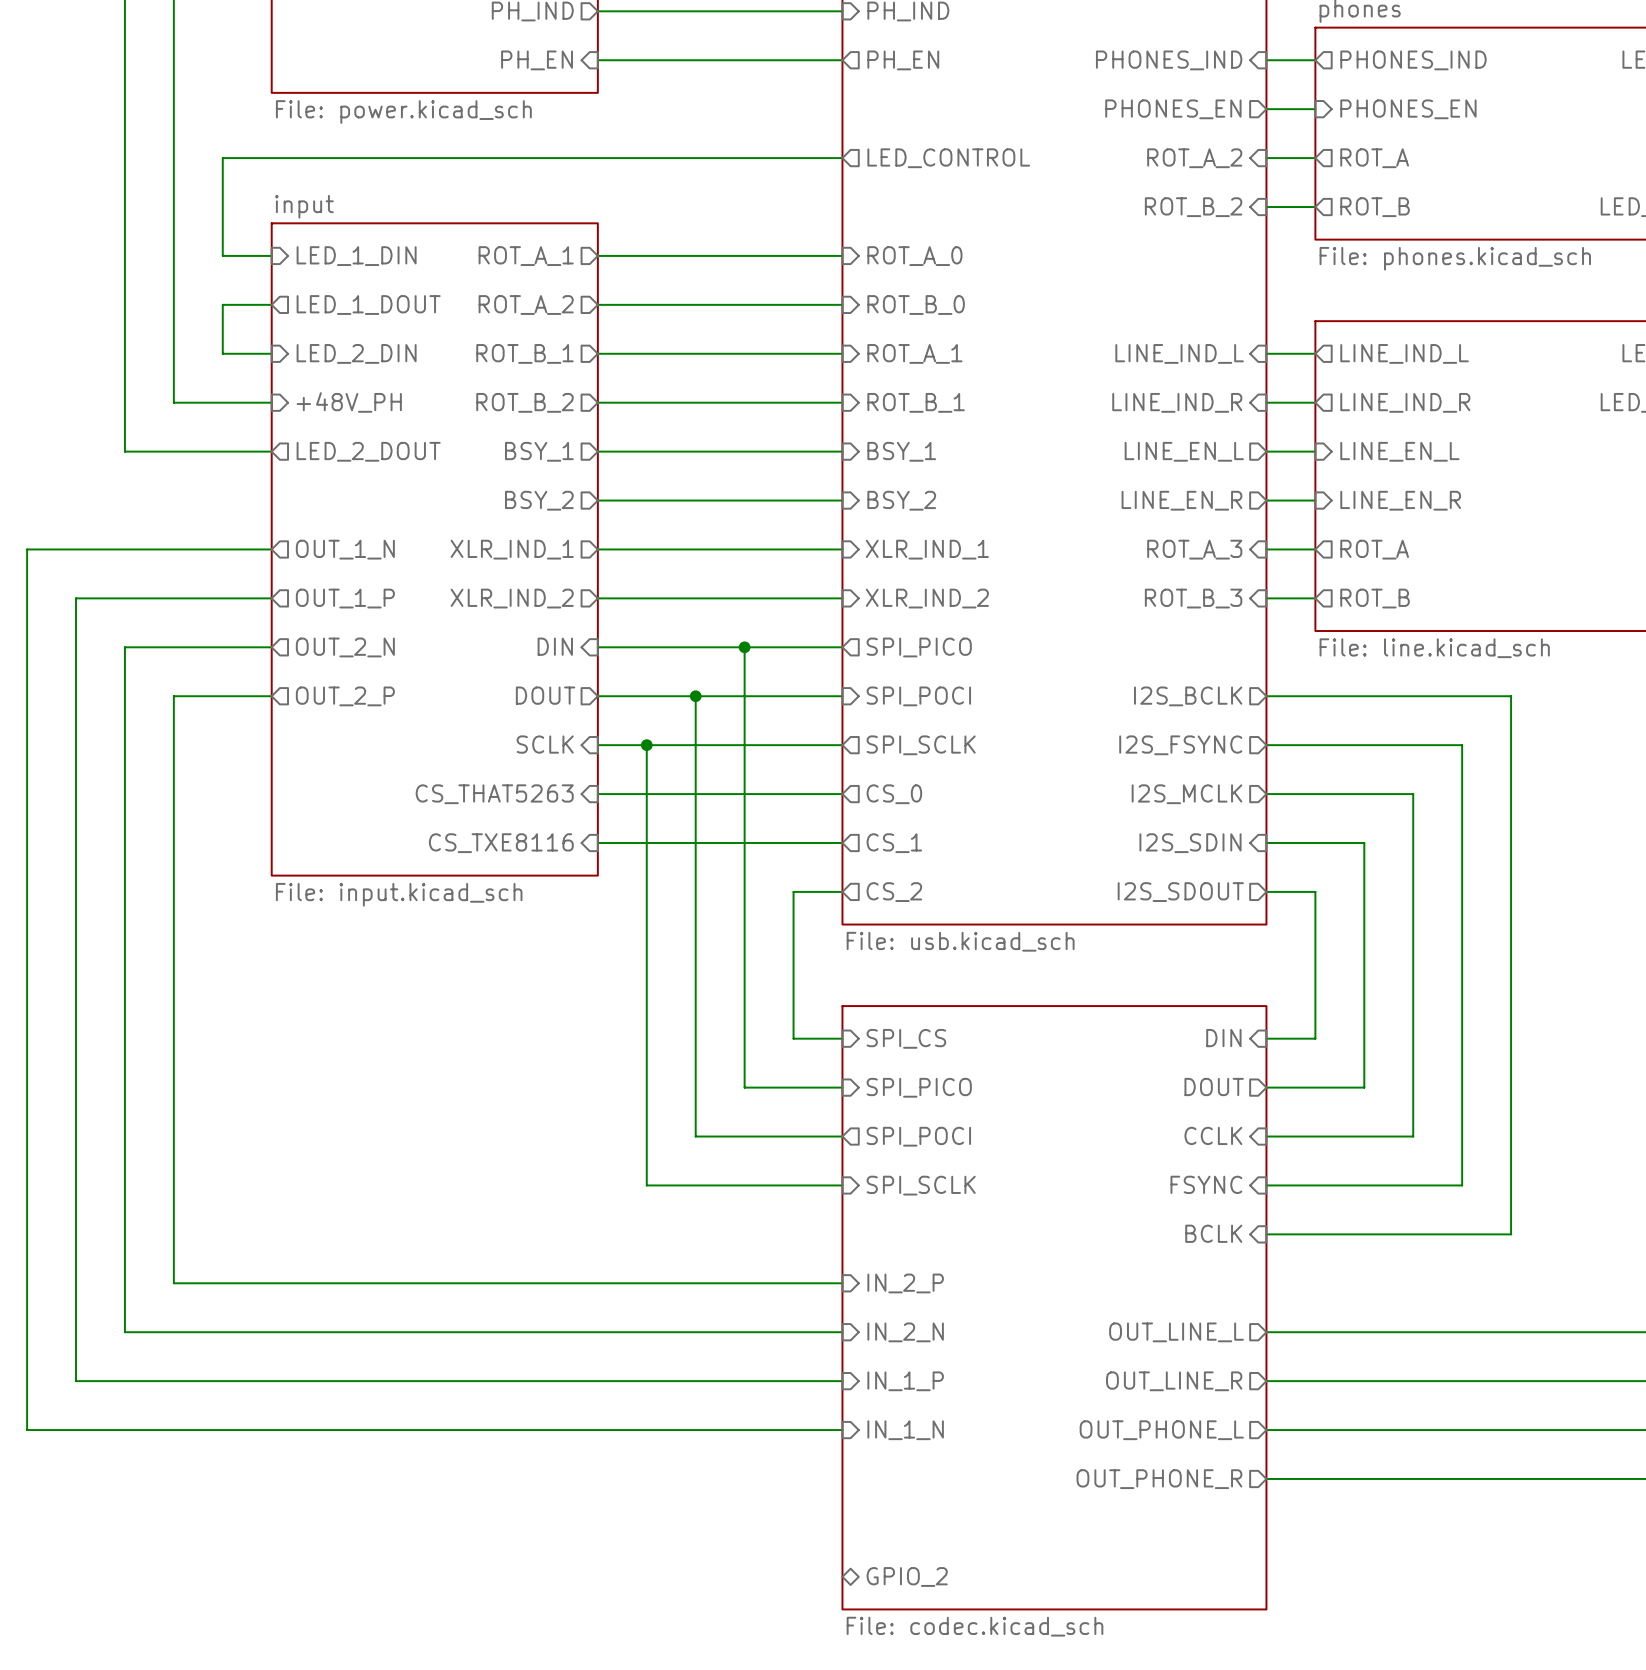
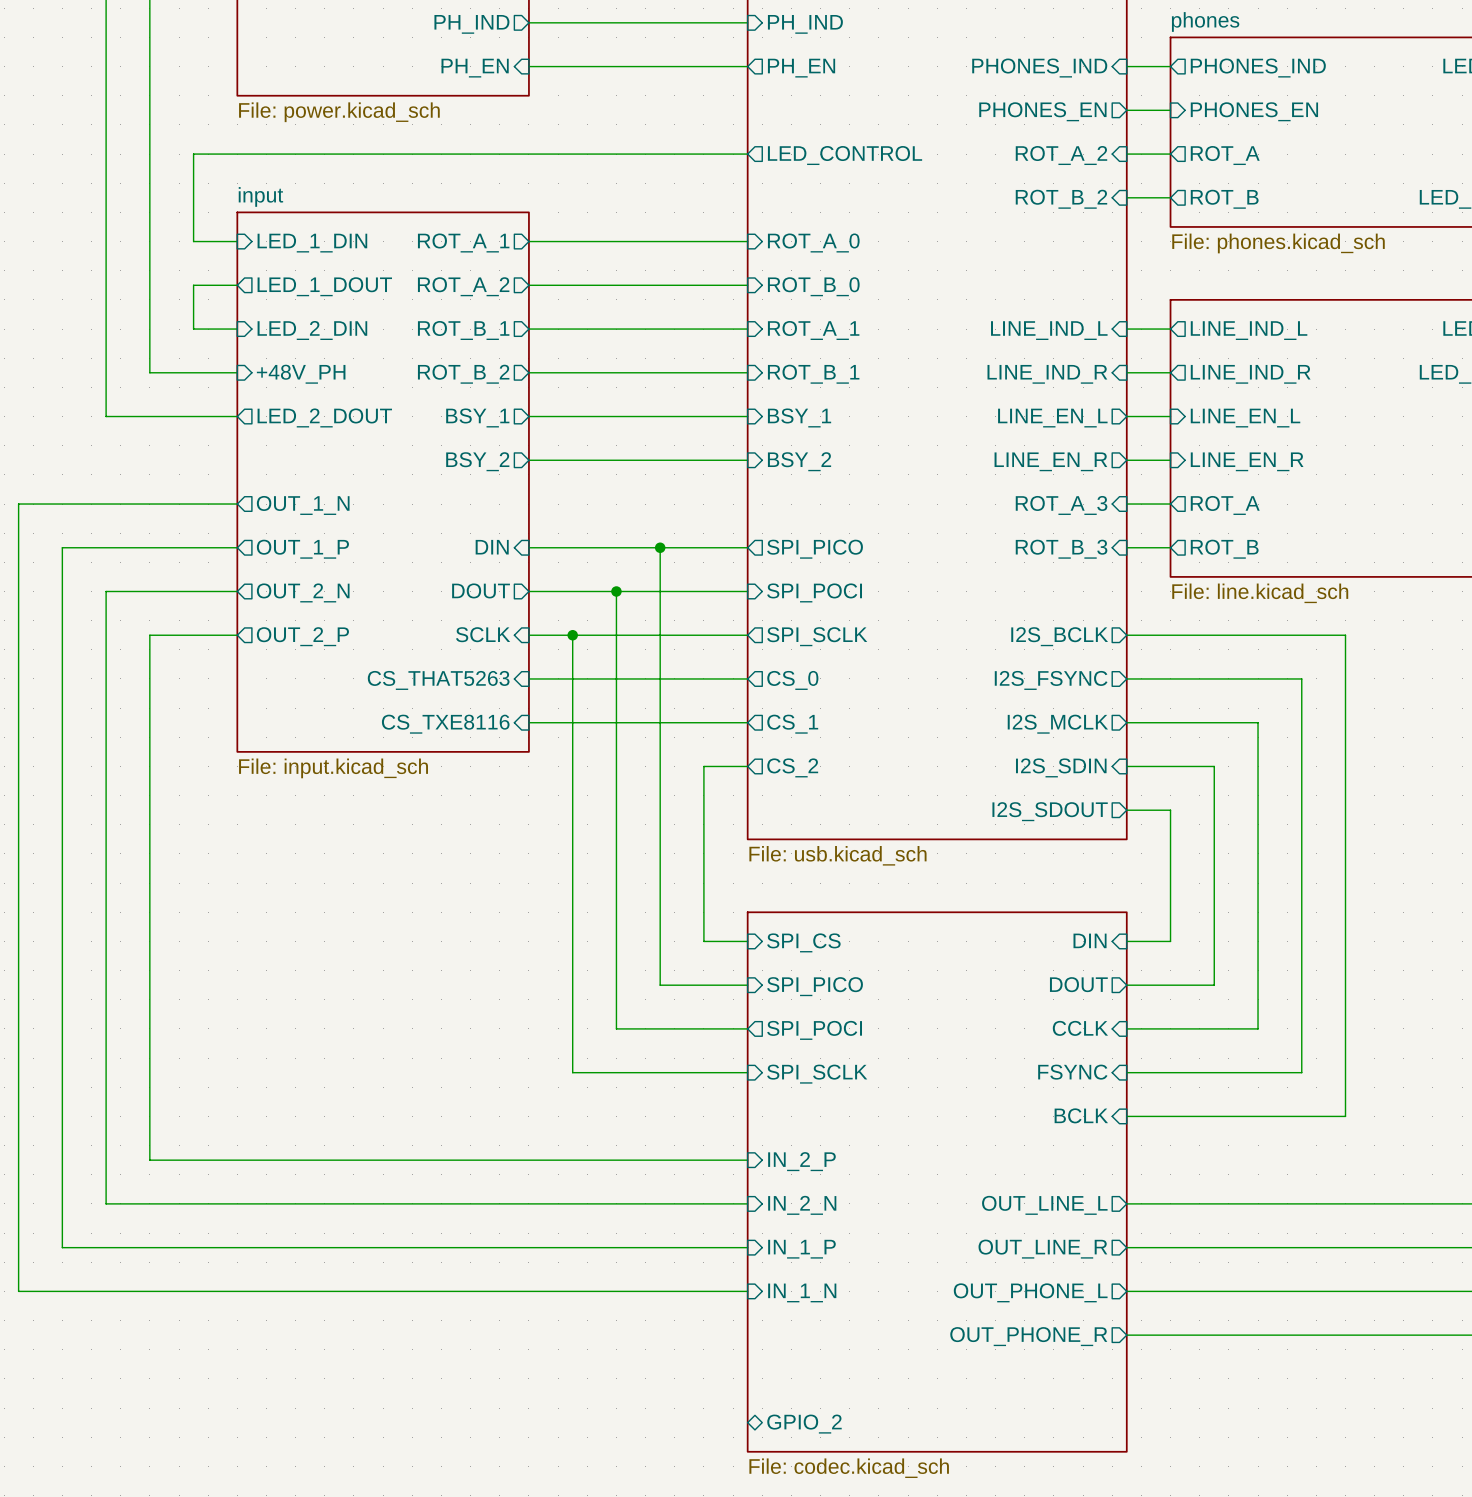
sheet input: none -> File: input.kicad_sch (383, 482)
sheet input: File: input.kicad_sch (434, 549) -> none
sheet pin: XLR_IND_1 (512, 549) -> none
wire: (597, 549) (842, 549) -> none
sheet pin: XLR_IND_1 (927, 549) -> none
sheet pin shape: output (512, 598) -> input (492, 547)
sheet pin: XLR_IND_2 (512, 598) -> DIN (492, 547)
wire: none -> (660, 547) (660, 591)
junction: none -> (660, 547)
sheet pin shape: input (927, 598) -> output (815, 549)
sheet pin: XLR_IND_2 (927, 598) -> SPI_PICO (815, 549)
sheet pin shape: input (555, 646) -> output (481, 590)
sheet pin: DIN (555, 646) -> DOUT (481, 590)
wire: none -> (616, 591) (616, 635)
junction: none -> (616, 591)
junction: (744, 647) -> none
sheet pin shape: output (919, 647) -> input (814, 592)
sheet pin: SPI_PICO (919, 647) -> SPI_POCI (814, 592)
sheet pin shape: output (545, 695) -> input (483, 634)
sheet pin: DOUT (545, 695) -> SCLK (483, 634)
wire: none -> (572, 635) (572, 678)
junction: none -> (572, 635)
junction: (695, 696) -> none
sheet pin shape: input (918, 696) -> output (817, 636)
sheet pin: SPI_POCI (918, 696) -> SPI_SCLK (817, 636)
sheet pin: SCLK (545, 744) -> CS_THAT5263 (438, 680)
junction: (646, 745) -> none
sheet pin: SPI_SCLK (921, 745) -> CS_0 (792, 680)
sheet pin: CS_THAT5263 (494, 794) -> CS_TXE8116 (445, 724)
sheet pin: CS_0 (894, 794) -> CS_1 (792, 724)
wire: (597, 842) (793, 842) -> none
sheet pin: CS_TXE8116 (501, 843) -> none
sheet pin: CS_1 (894, 843) -> CS_2 (792, 767)
wire: (793, 891) (842, 891) -> (703, 810) (703, 766)
sheet pin: CS_2 (894, 892) -> none

